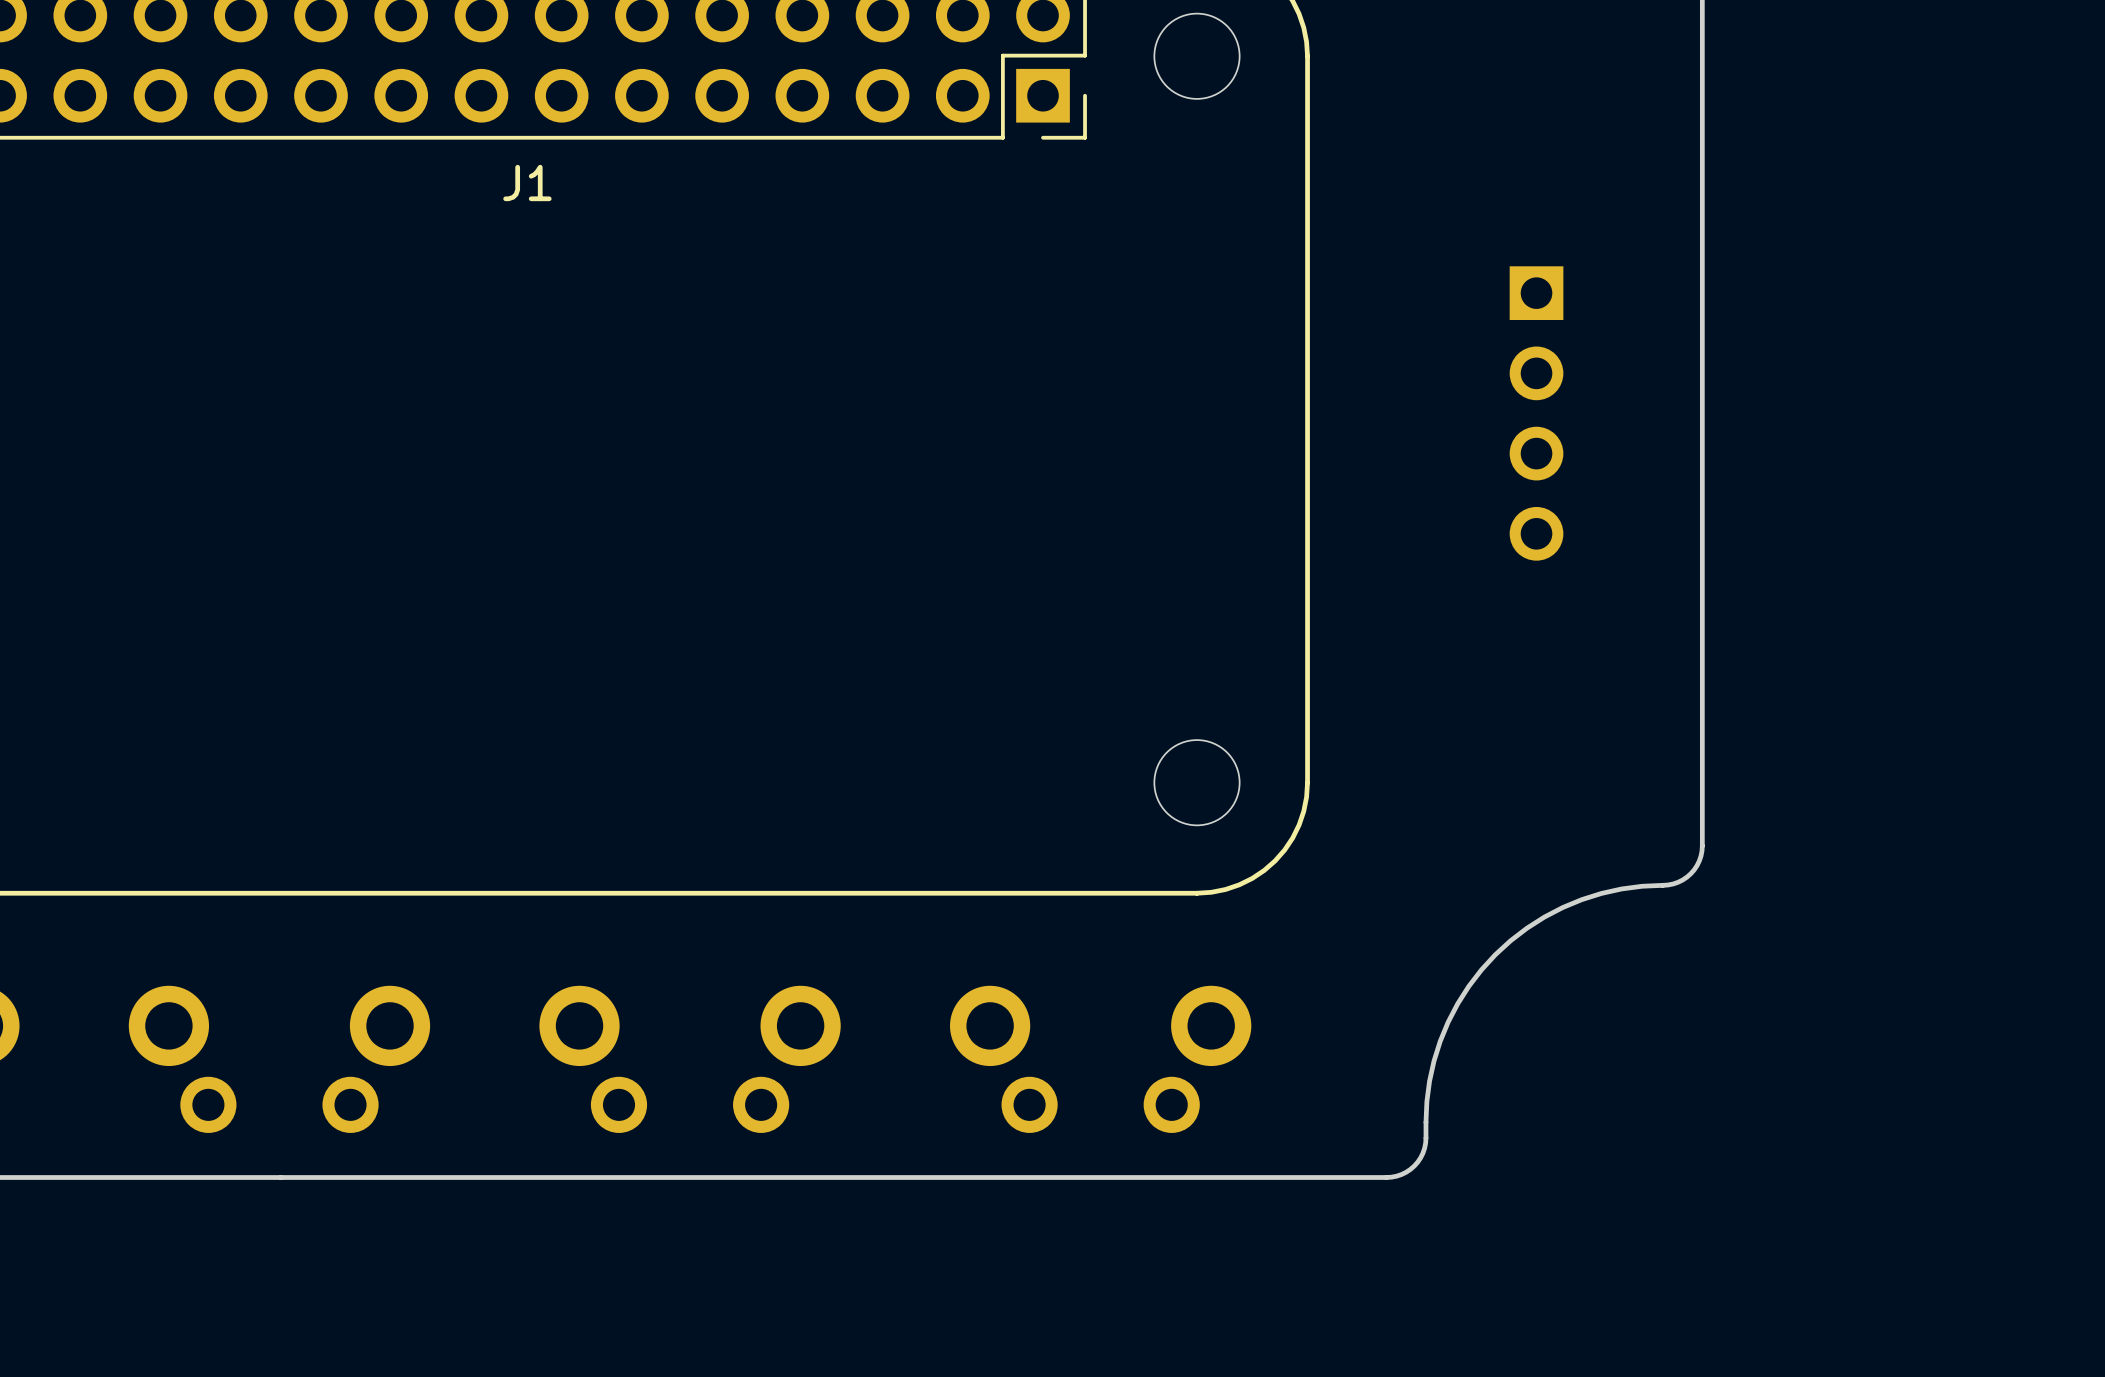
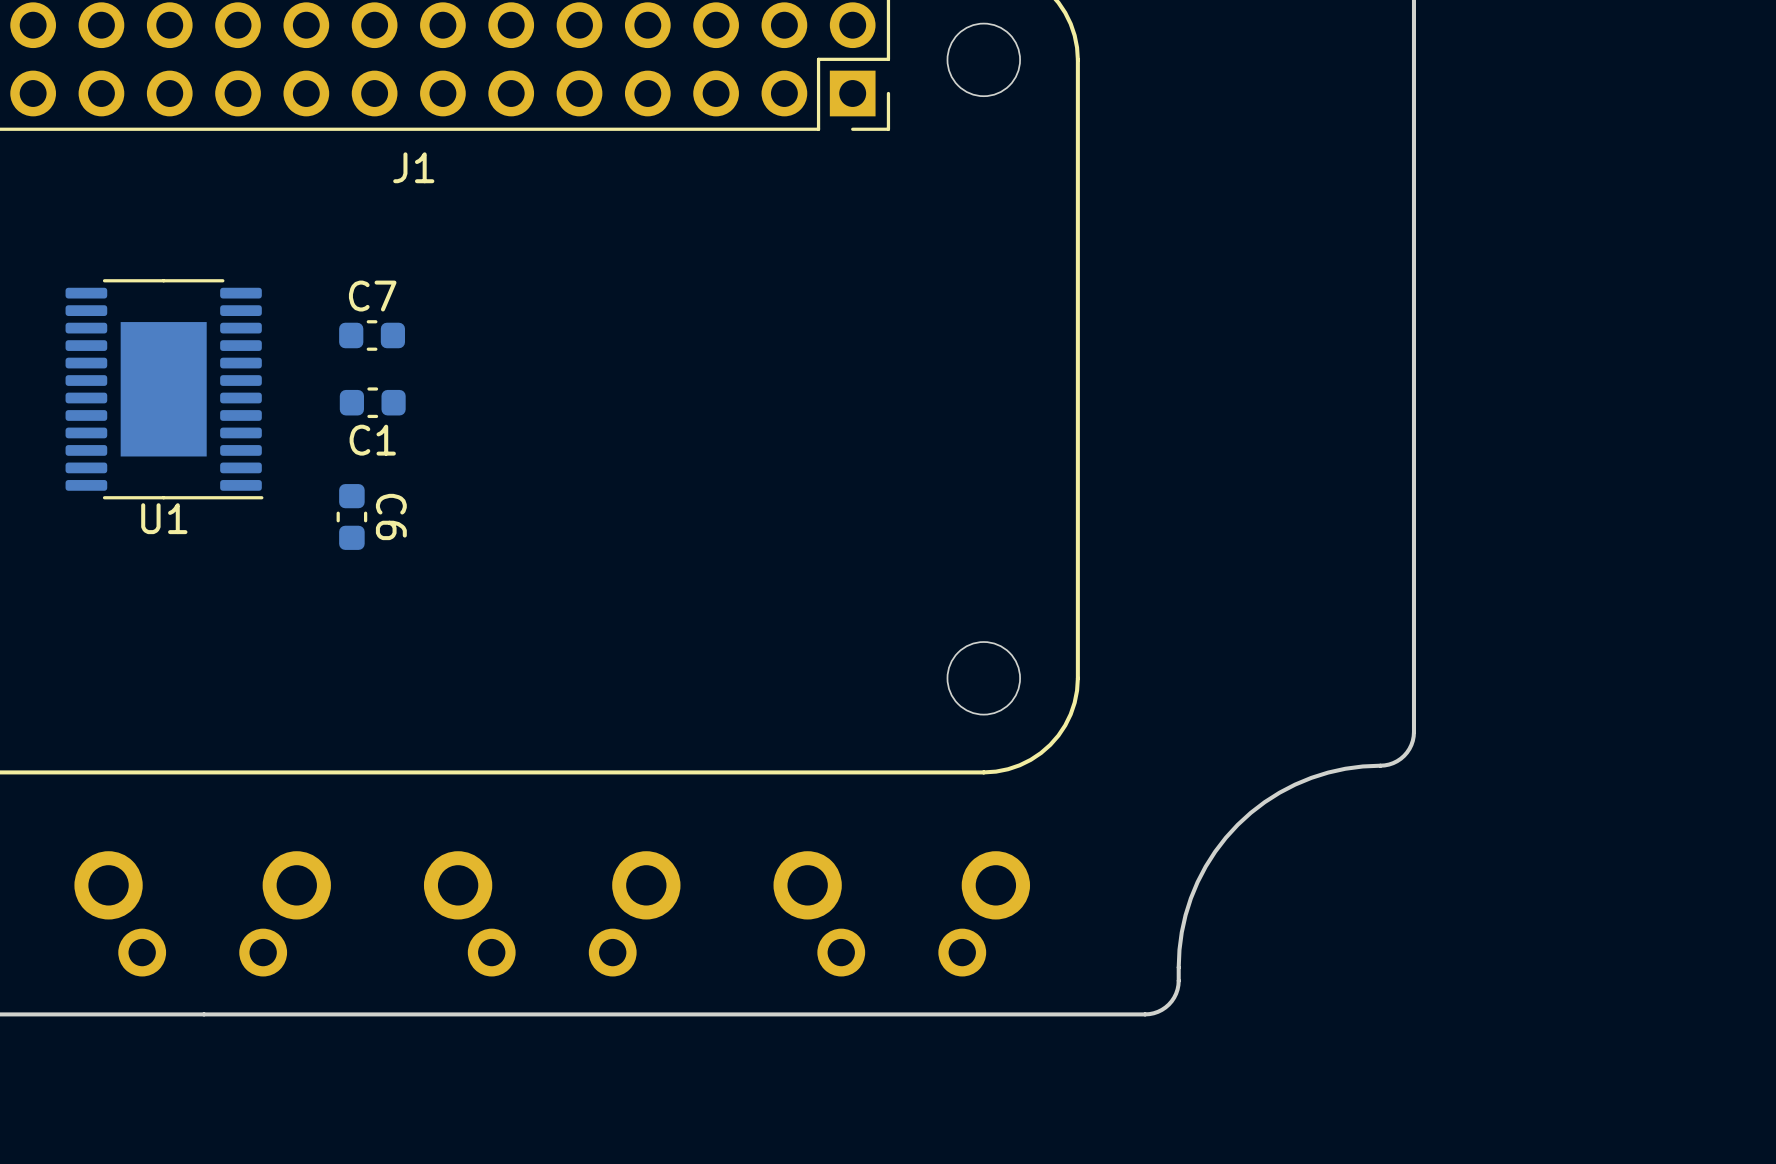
C7: none -> (372, 335)
part: (1536, 413) -> none
U1: none -> (164, 389)
C1: none -> (372, 402)
C6: none -> (351, 516)

